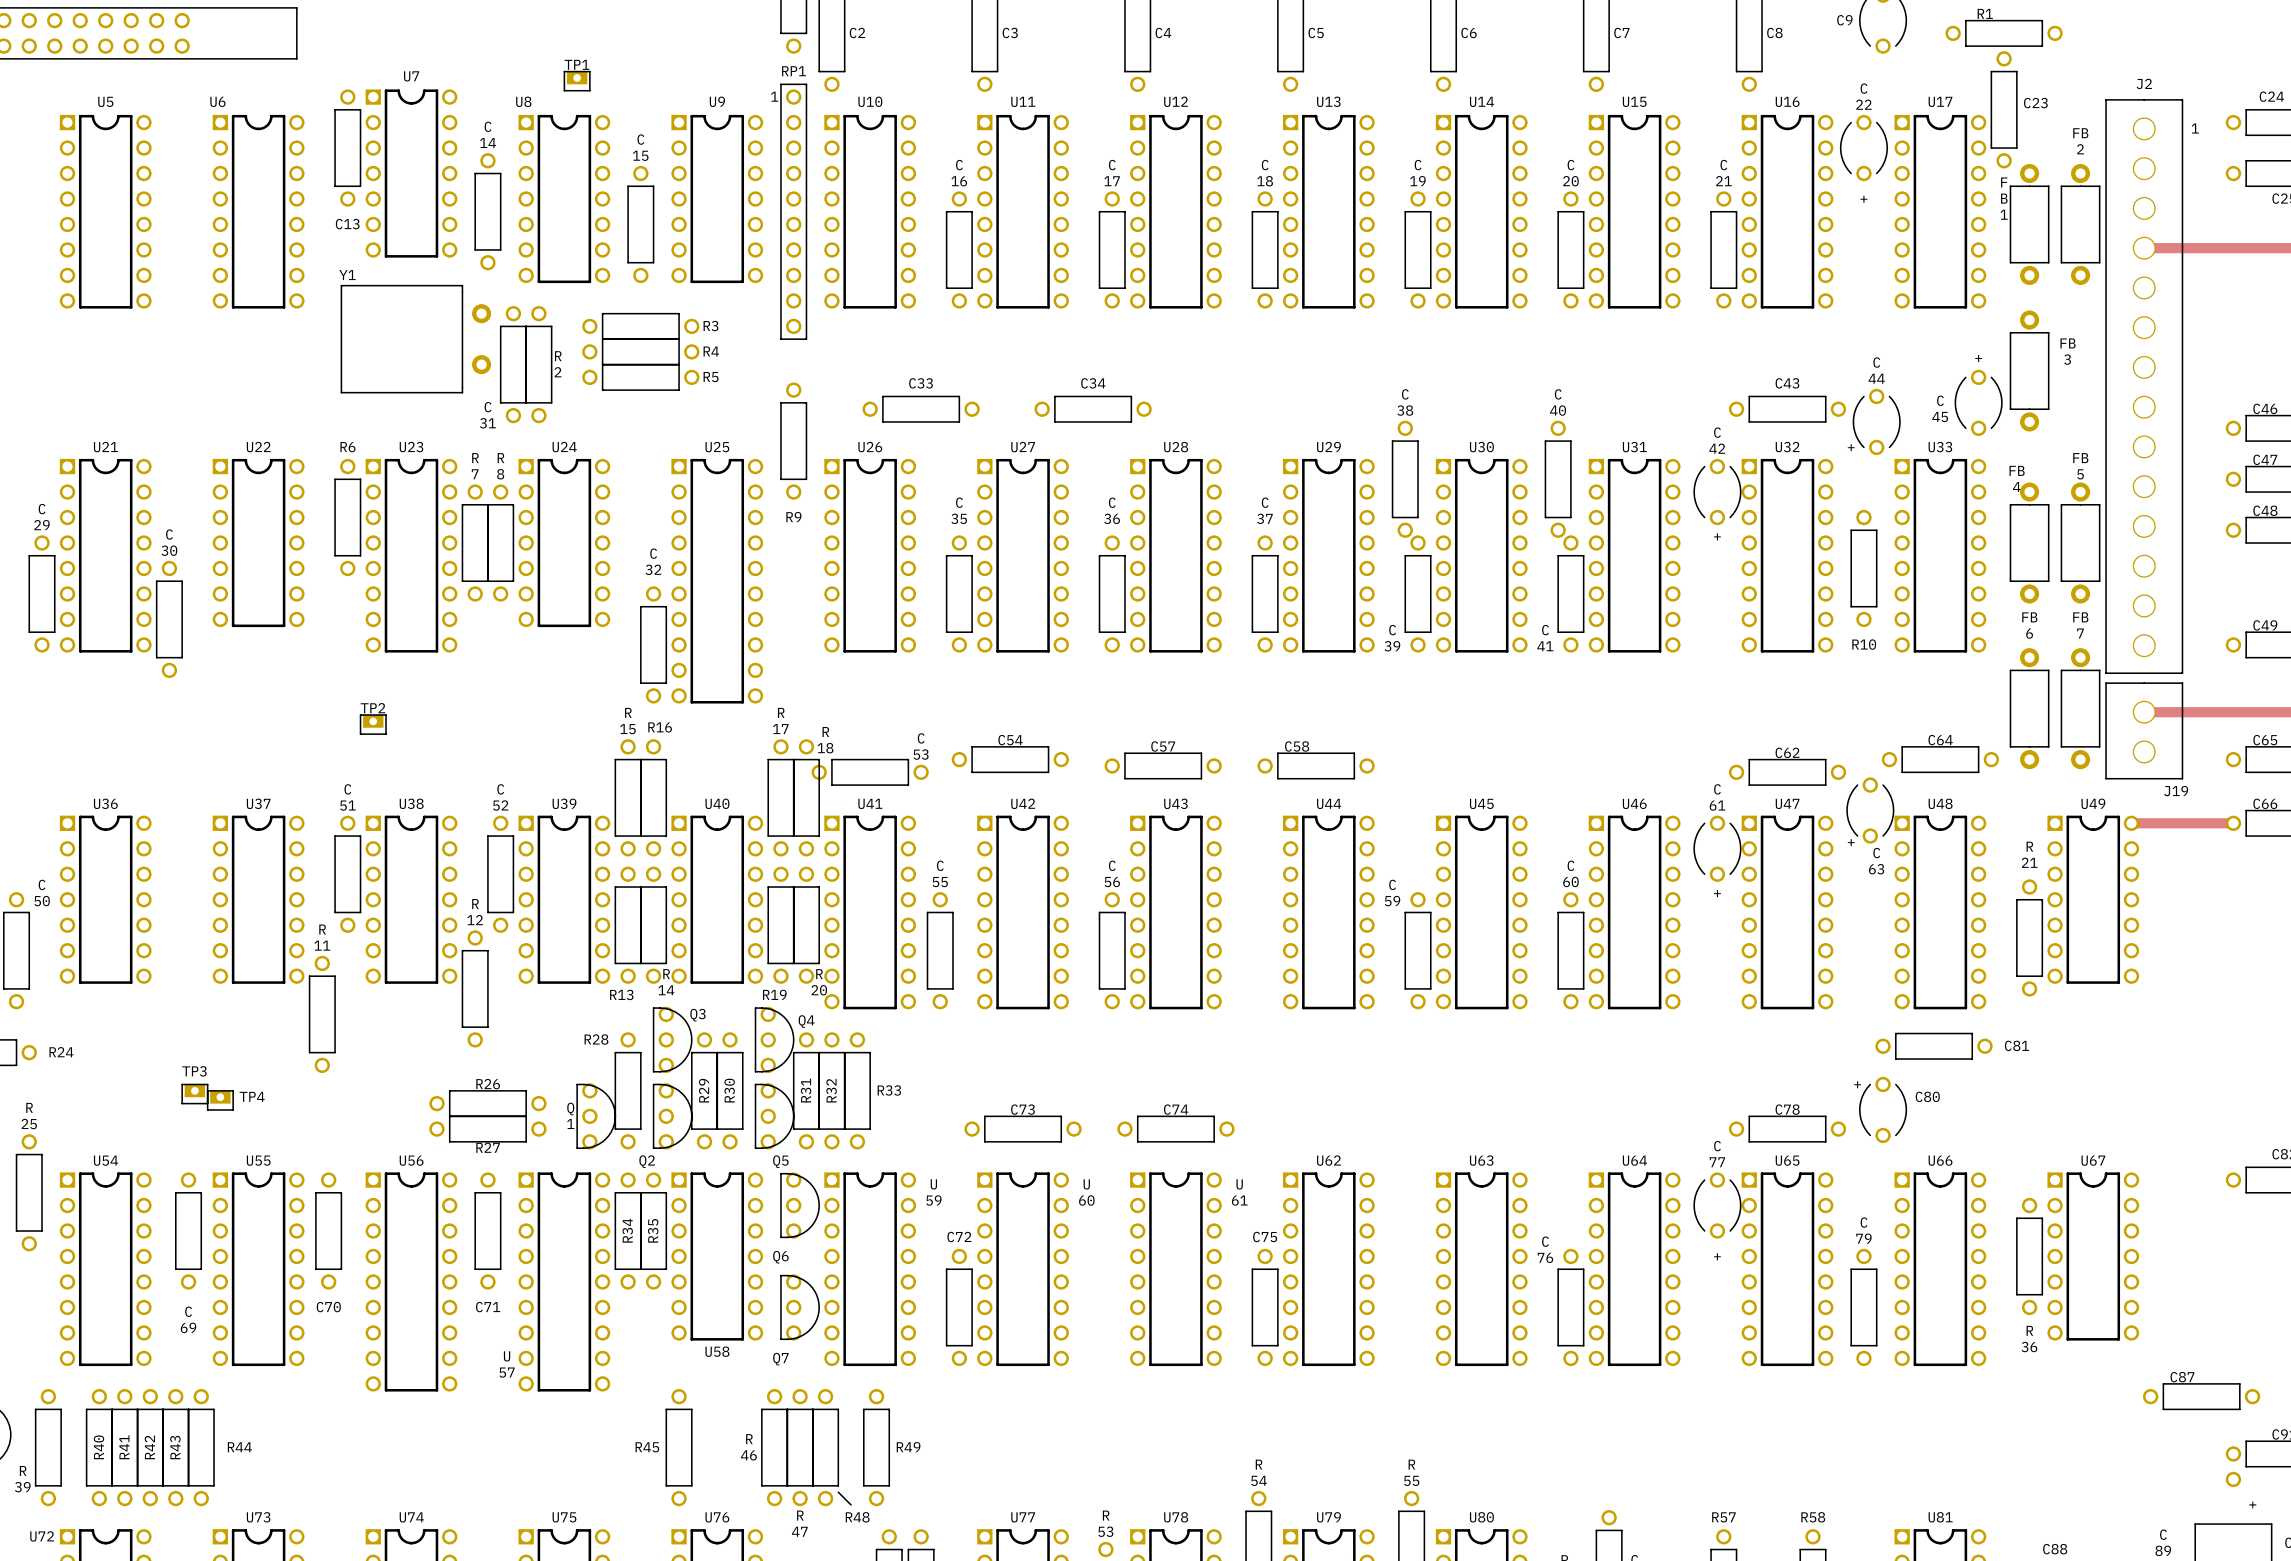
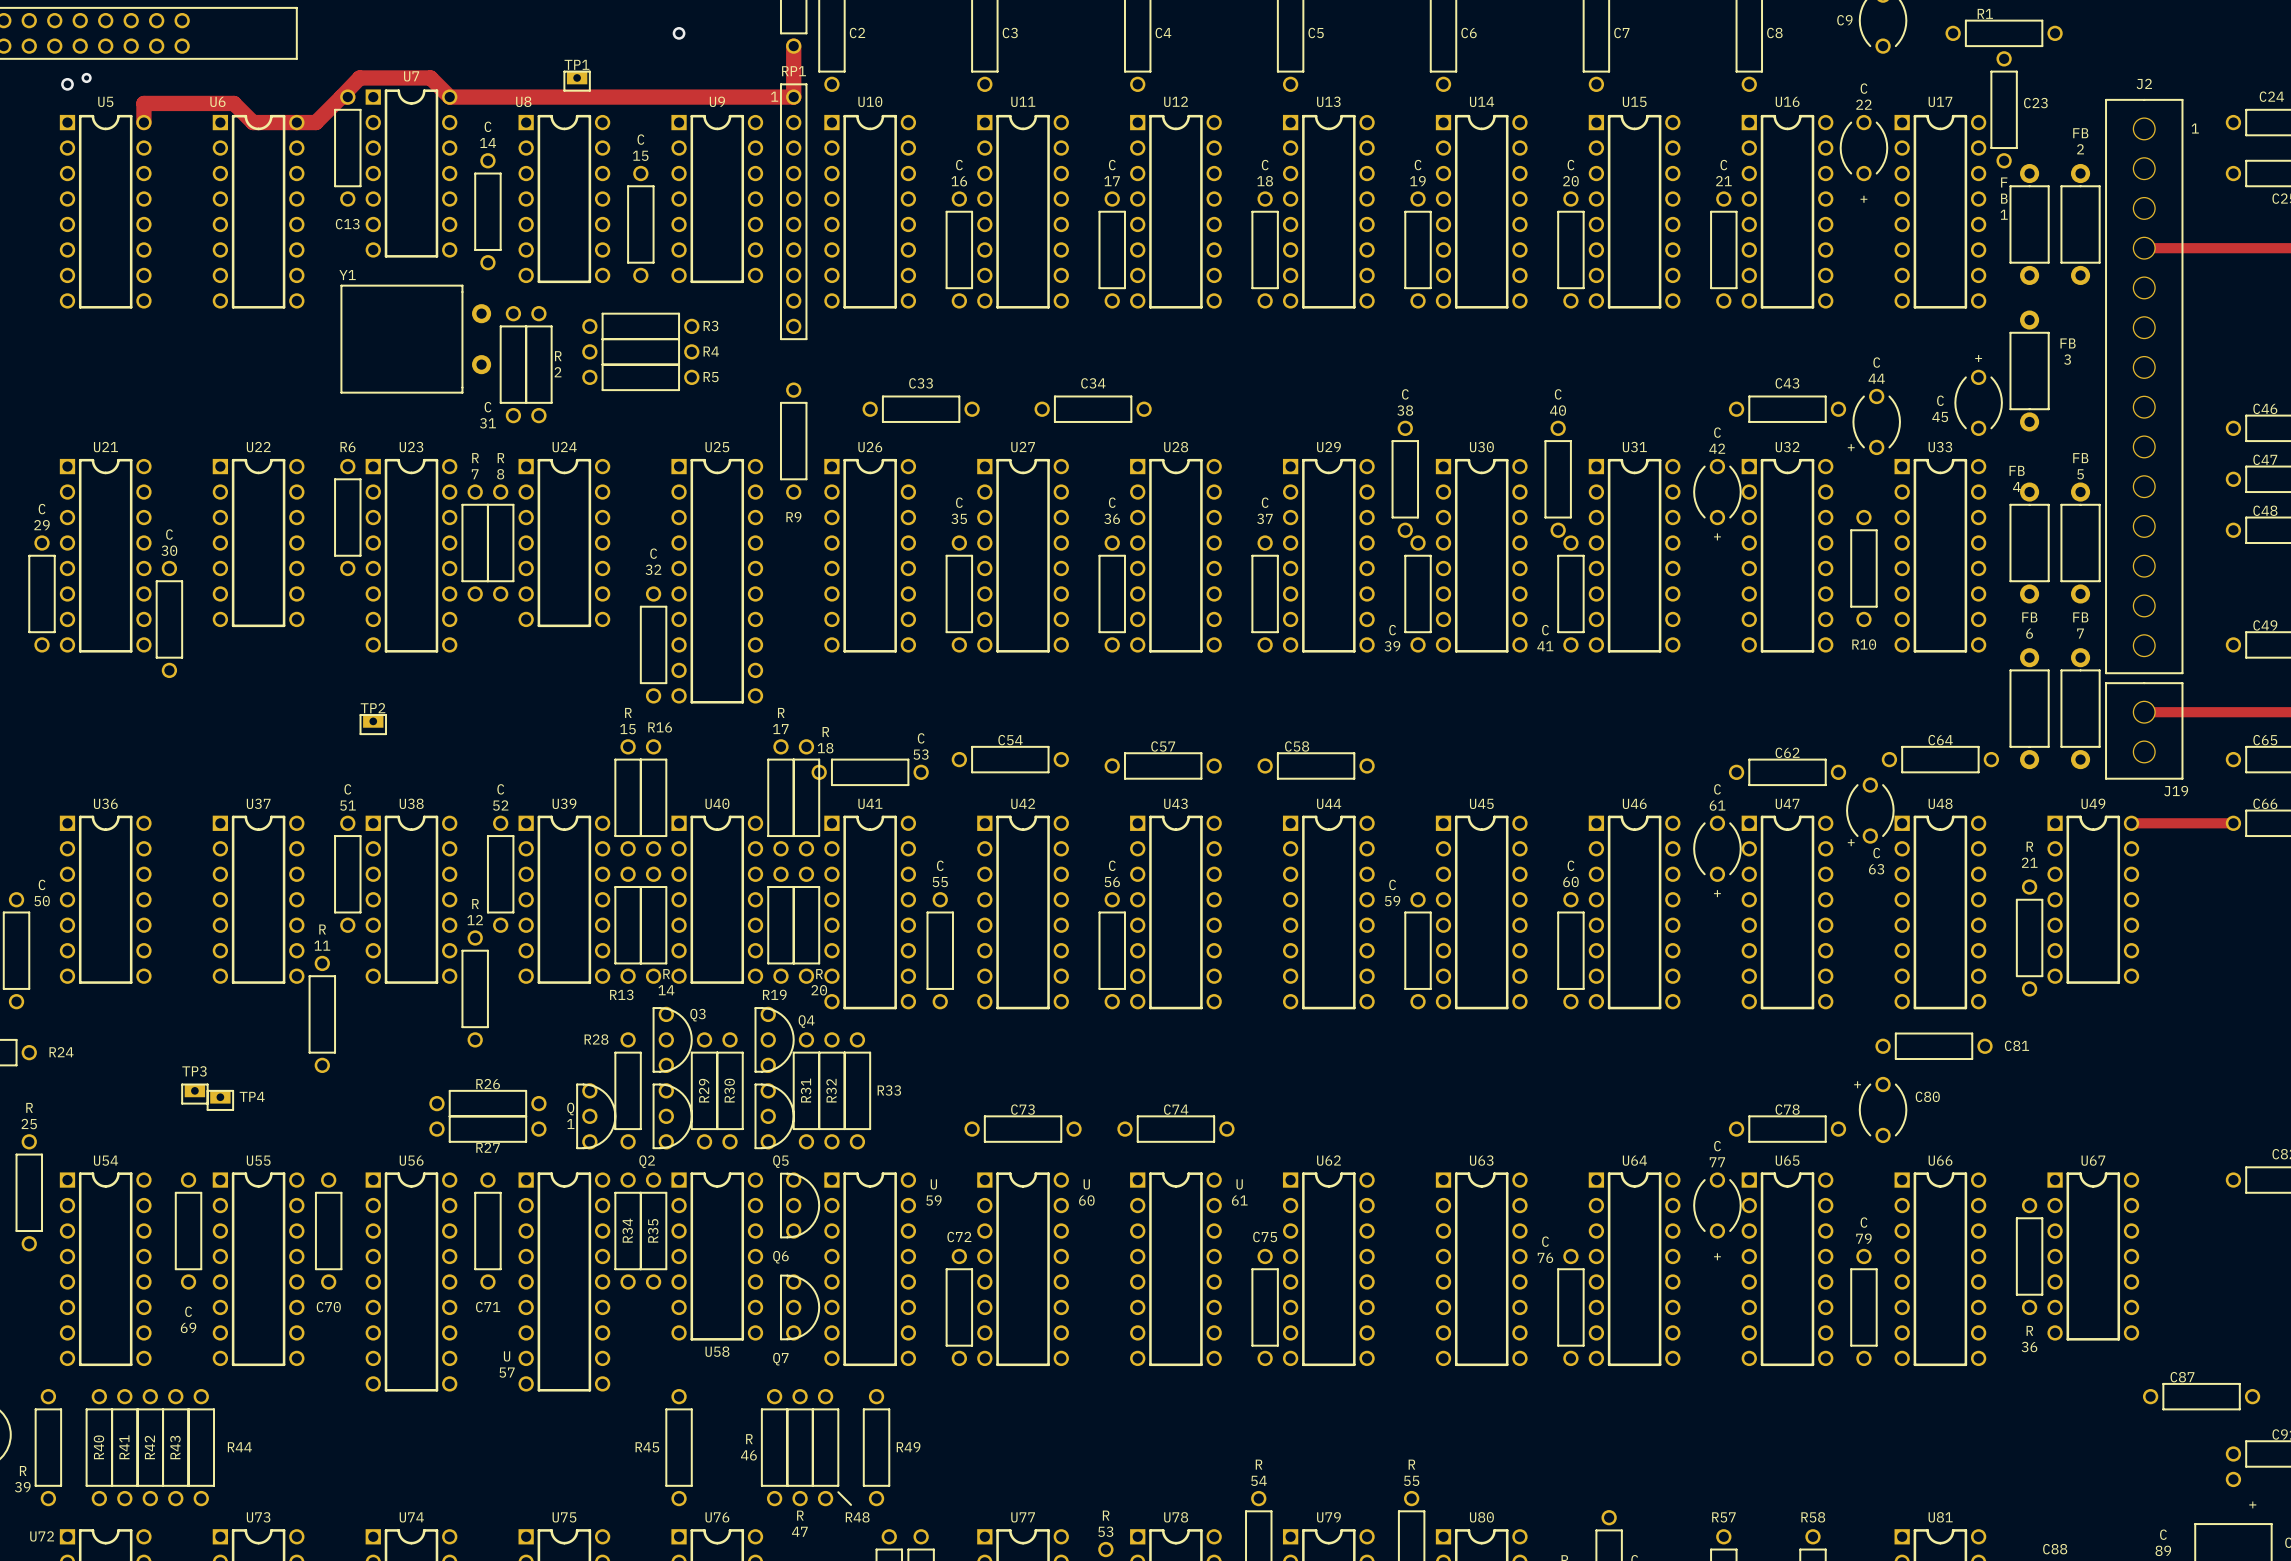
via: none -> (679, 33)
track: none -> (793, 46) (793, 97) (449, 97) (430, 77) (359, 77) (341, 97)
via: none -> (86, 77)
via: none -> (67, 84)
track: none -> (341, 97) (315, 122) (253, 122) (233, 103) (143, 103) (143, 122)

